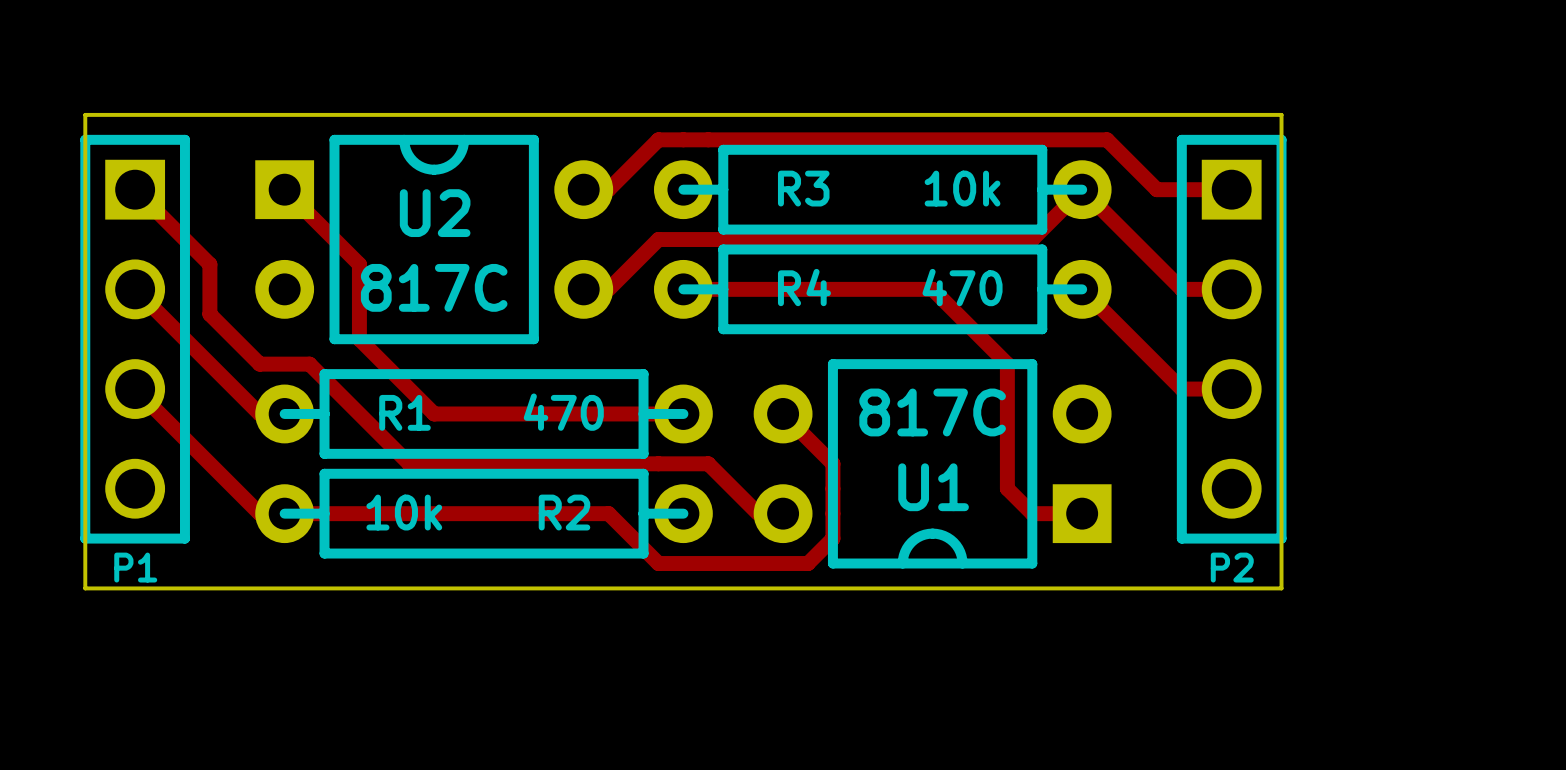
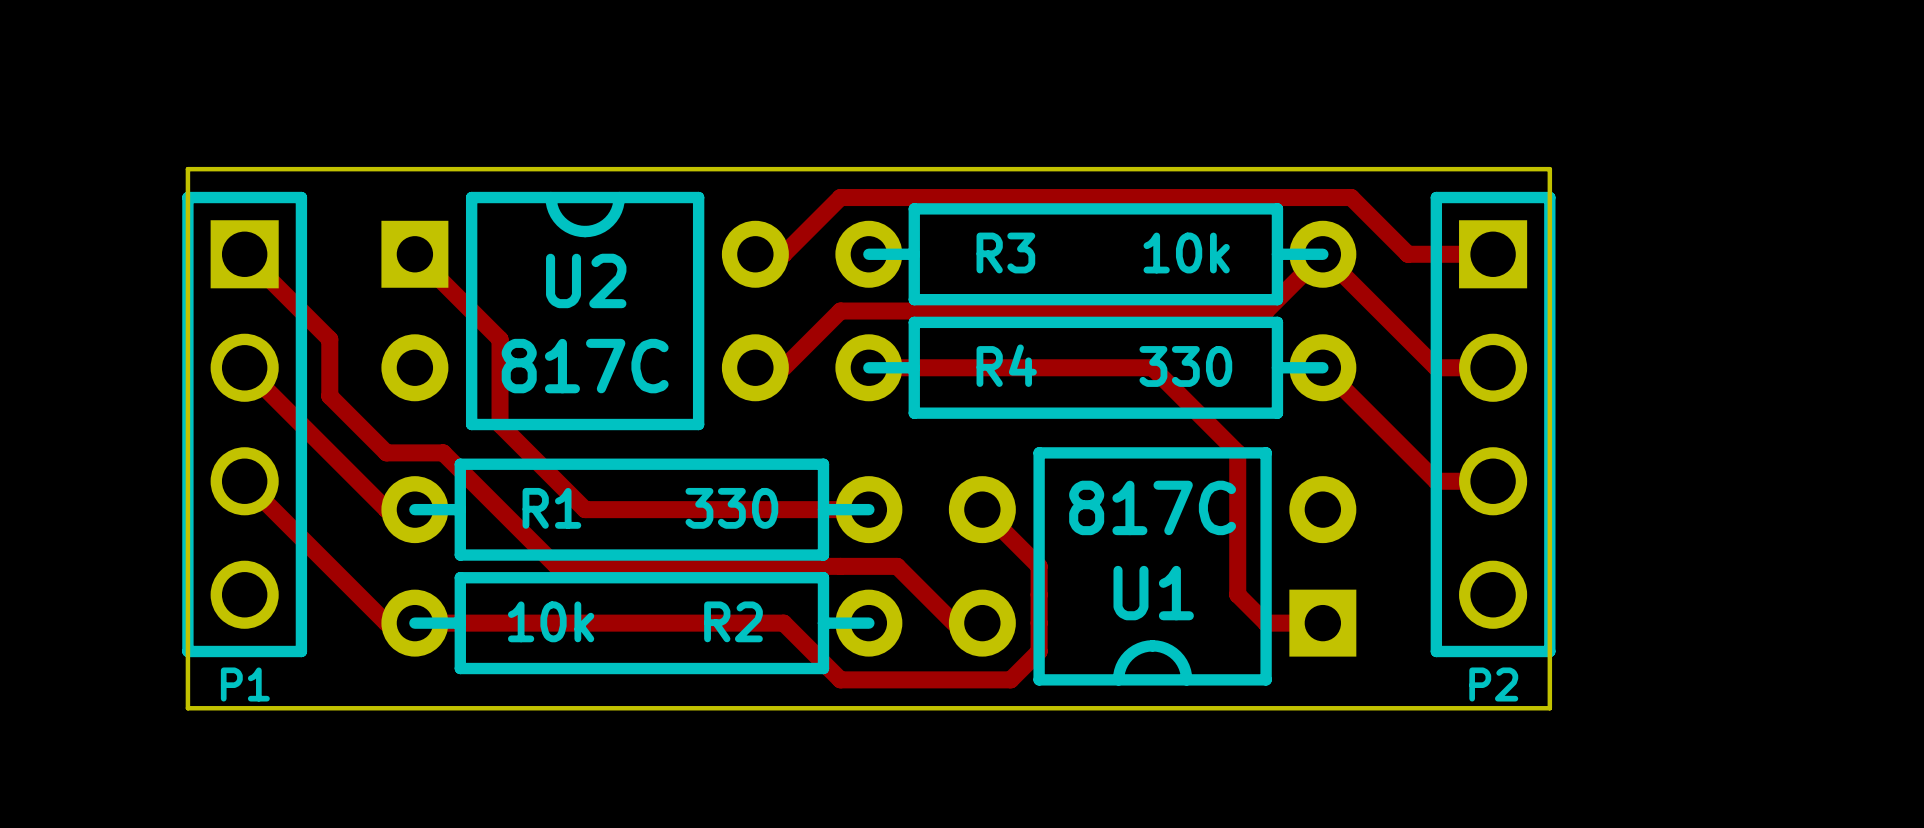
R4 value: 470 (962, 287) -> 330 (1185, 366)
R1 value: 470 (563, 412) -> 330 (731, 508)

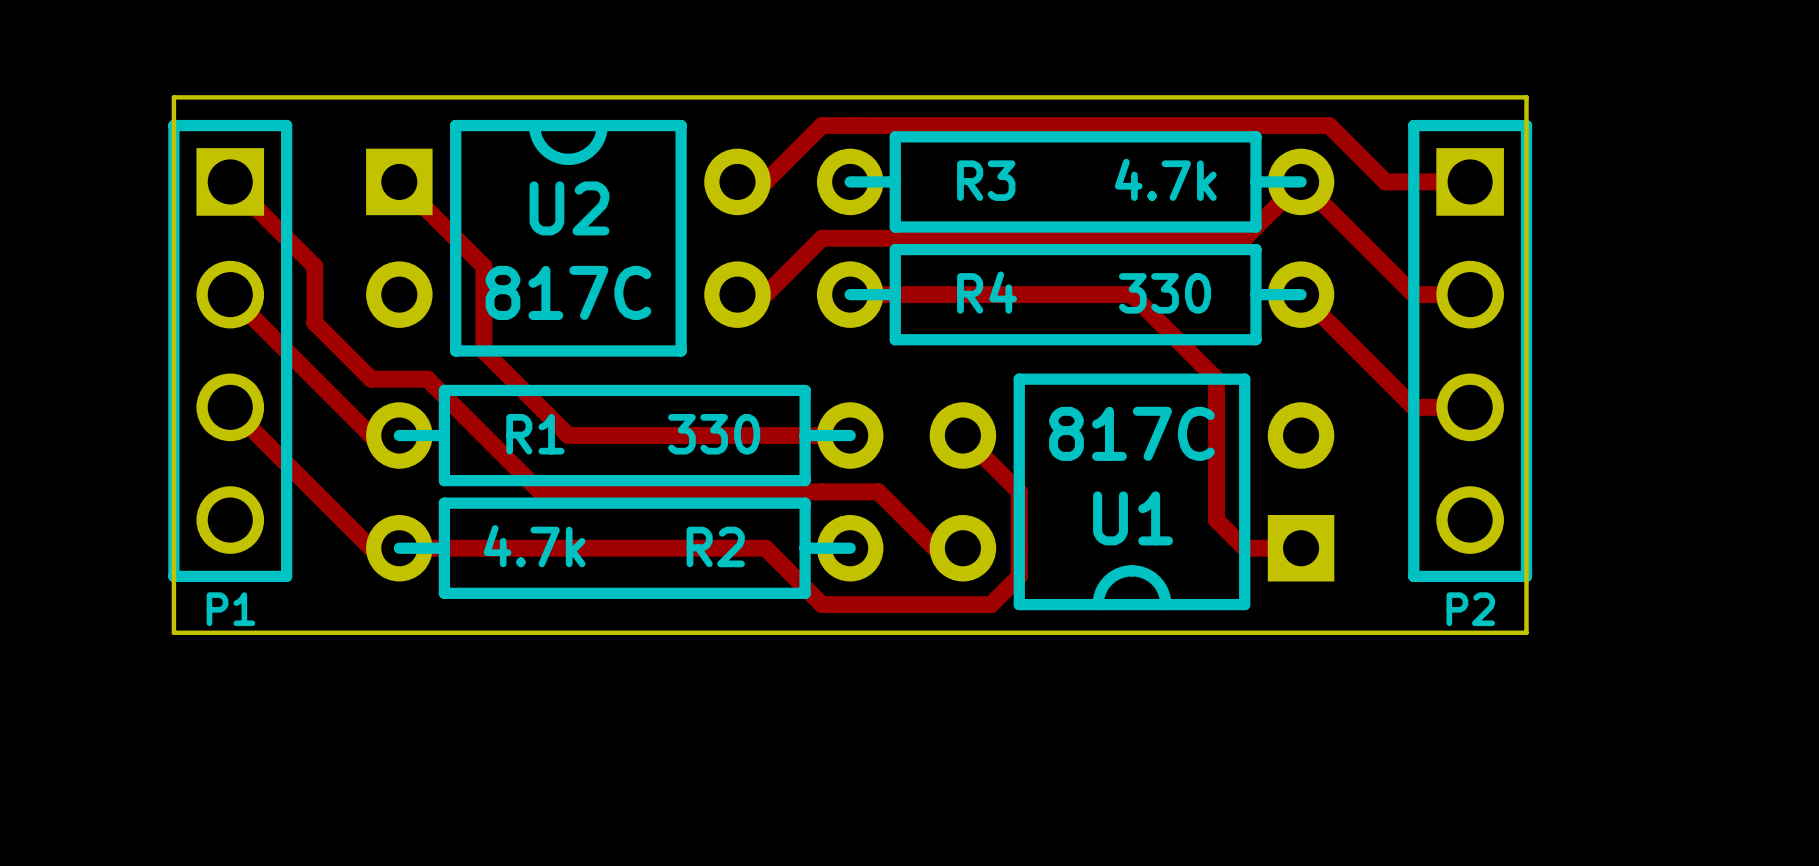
R3 value: 10k (1186, 253) -> 4.7k (1165, 179)
R2 value: 10k (551, 621) -> 4.7k (534, 546)

